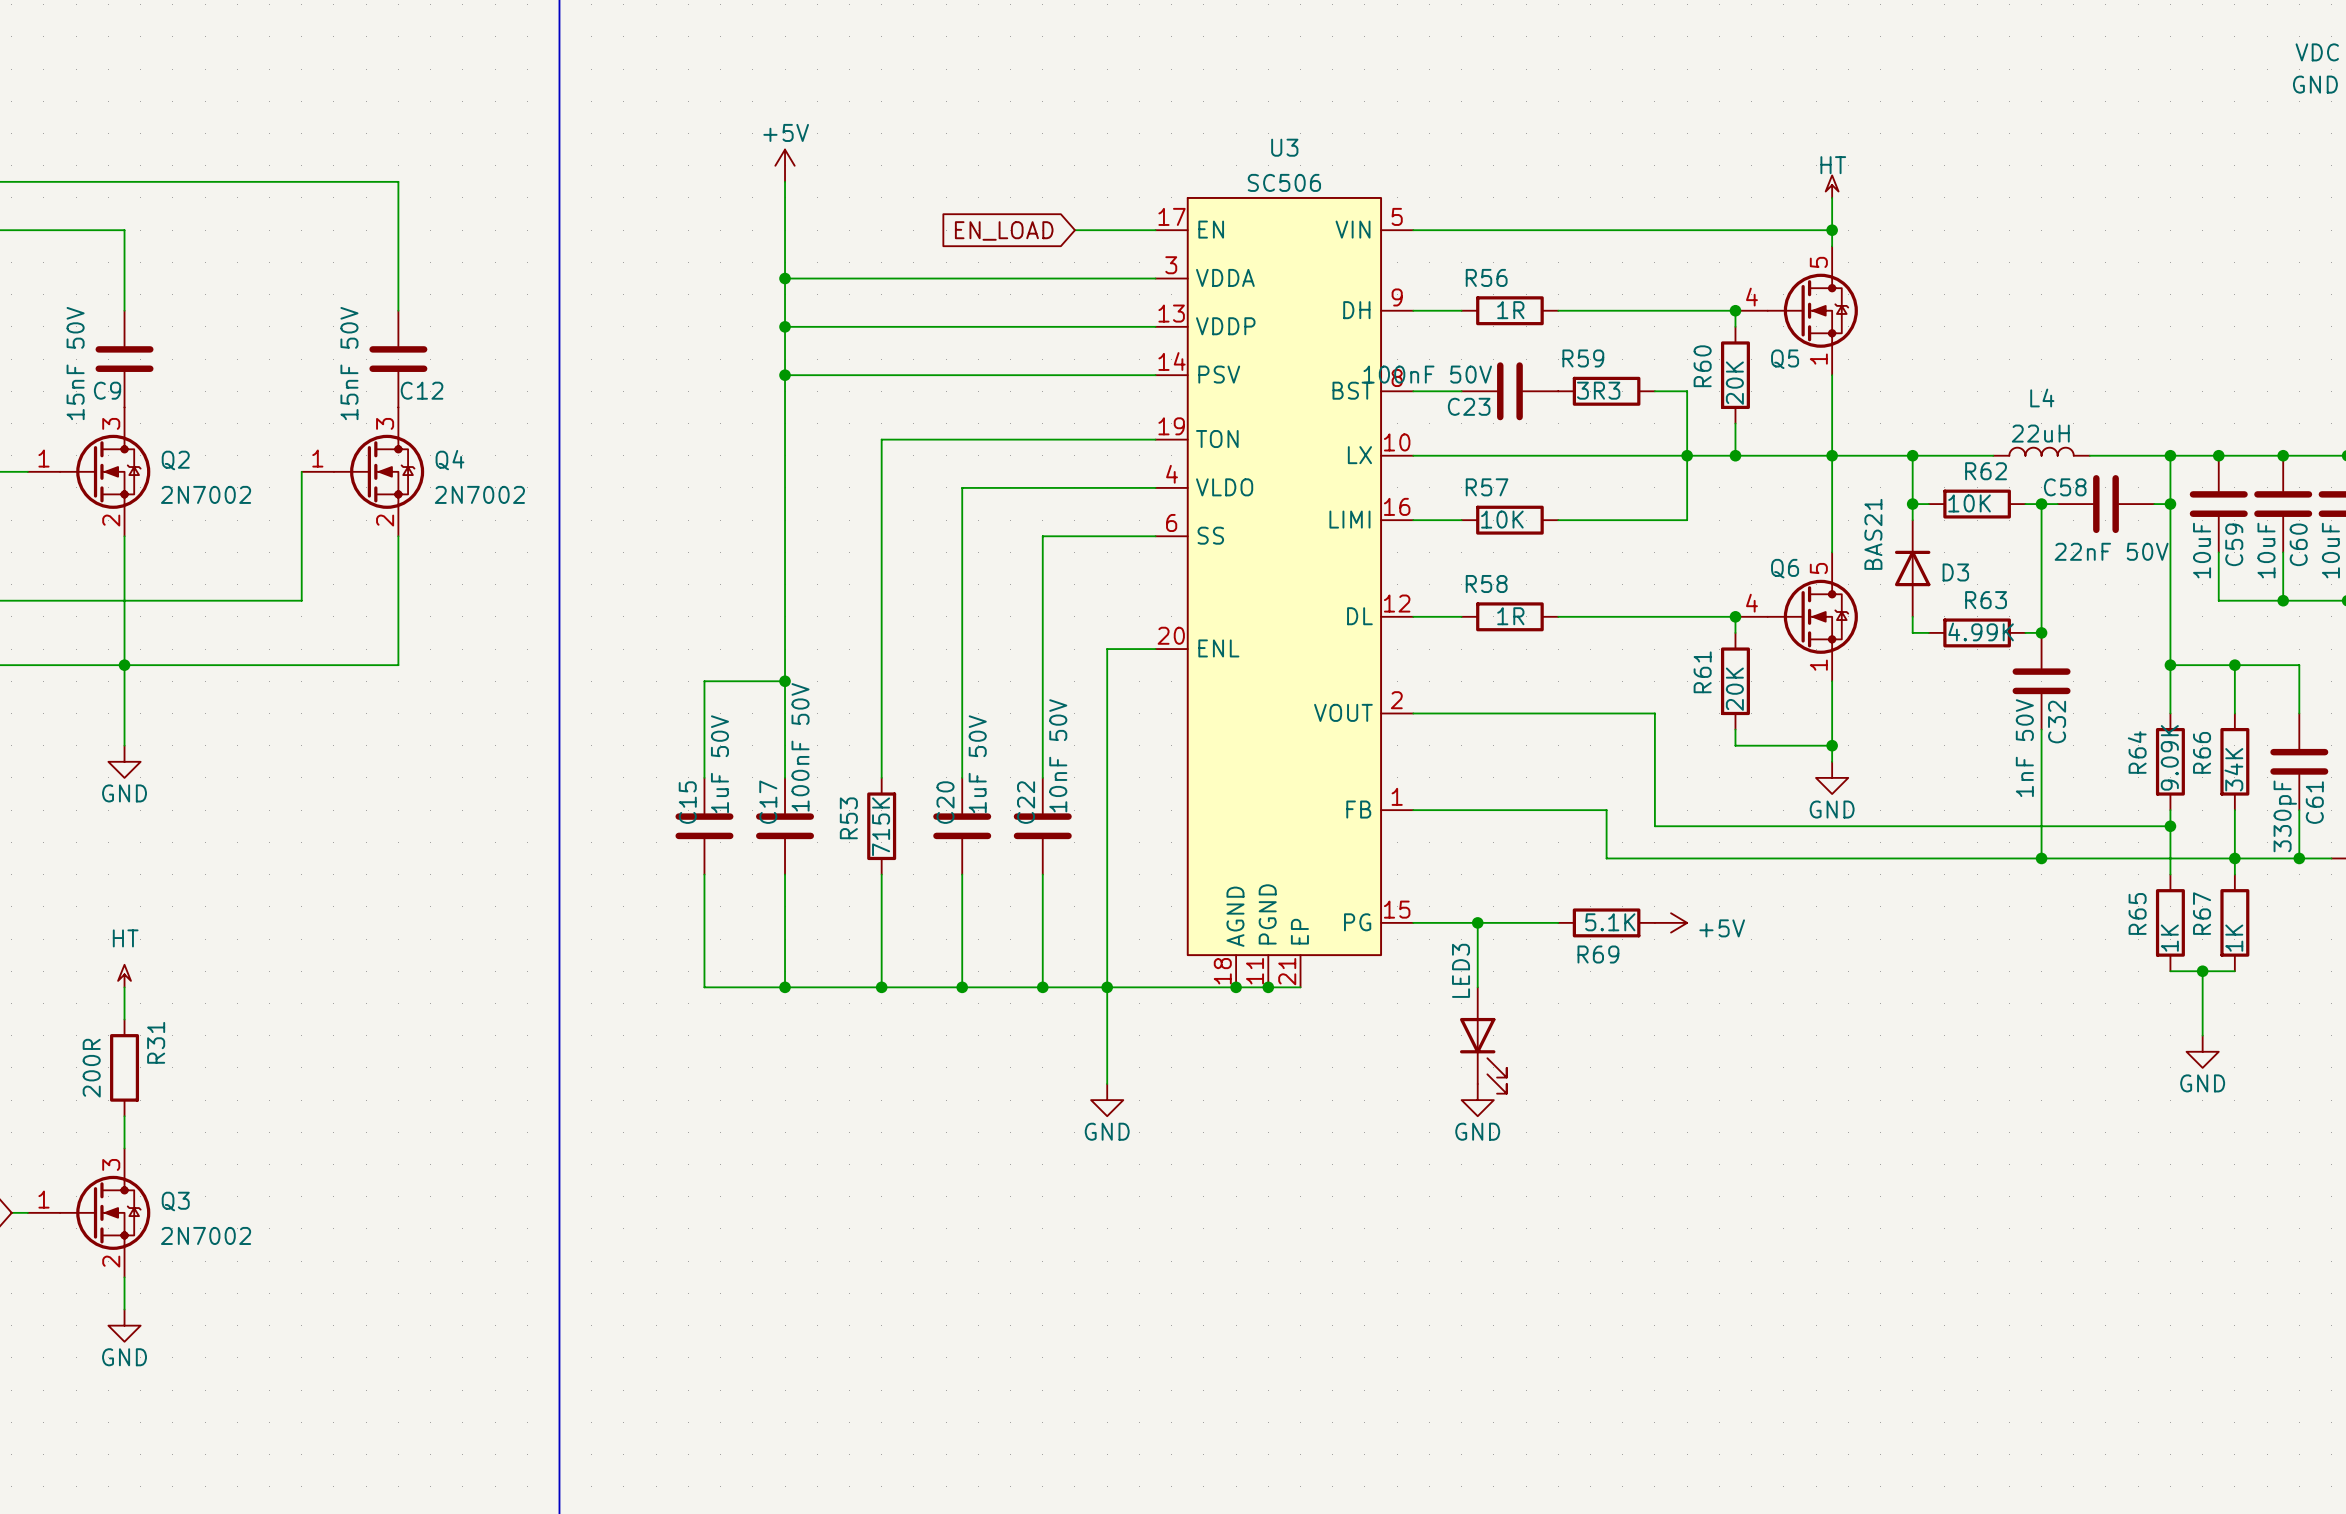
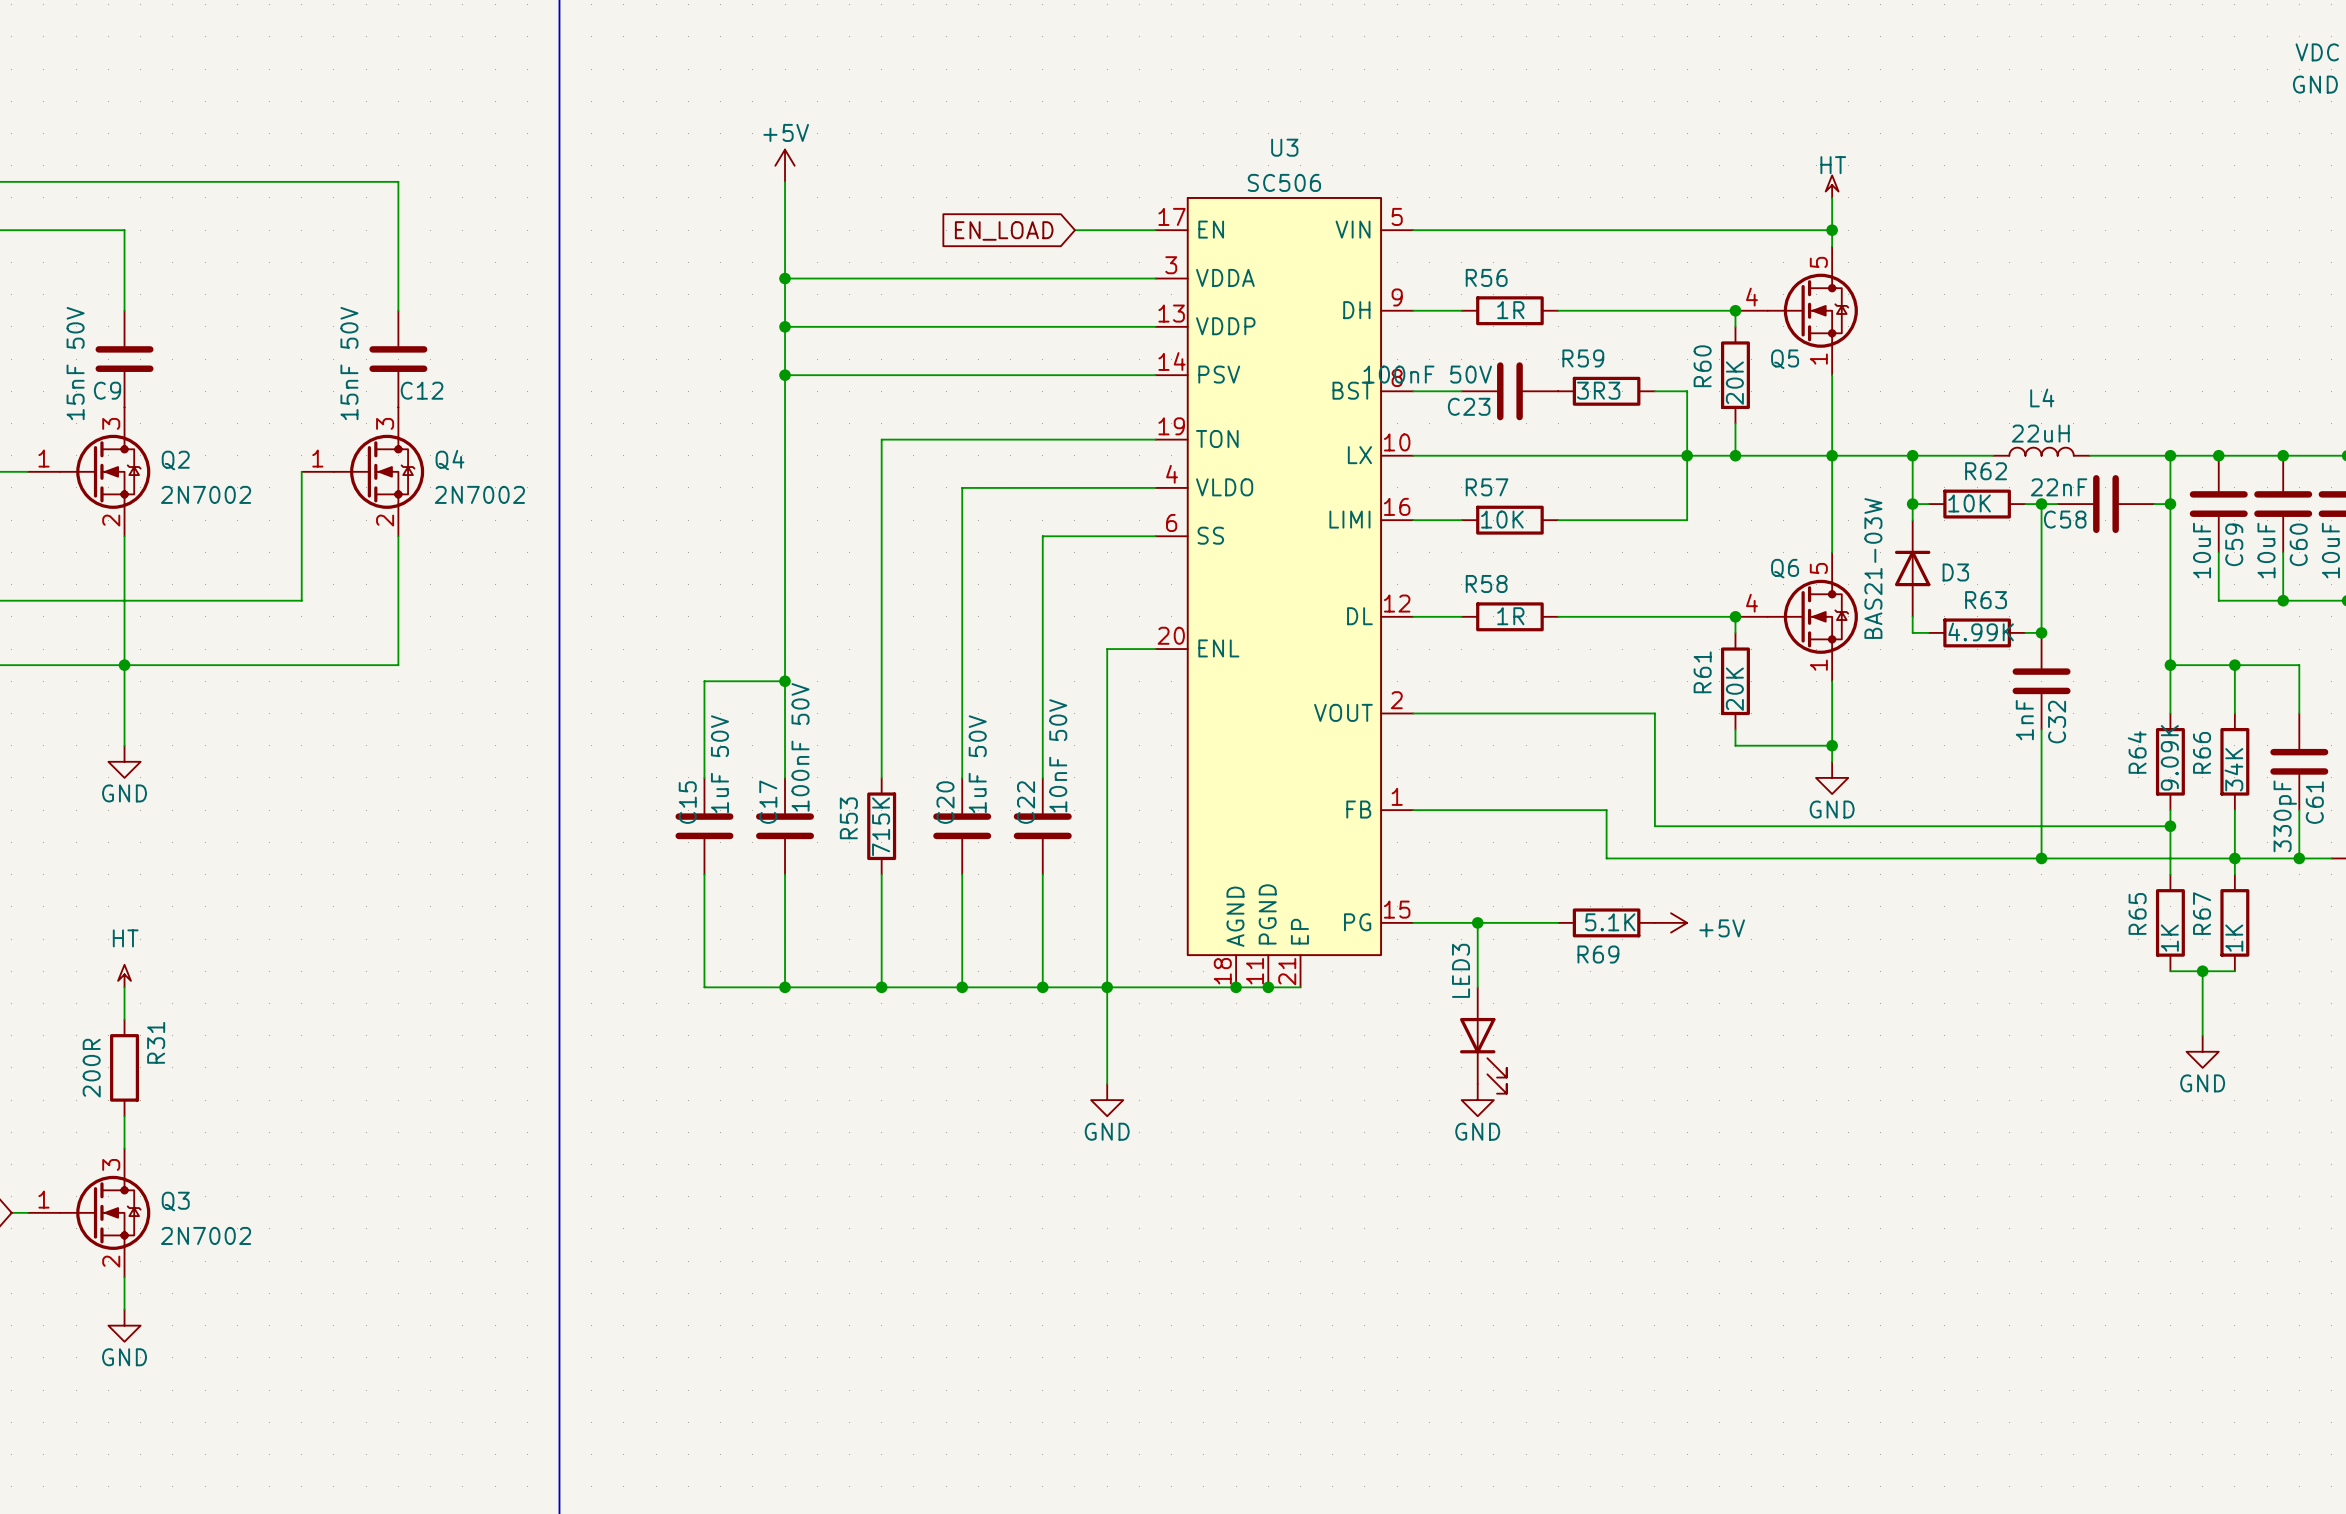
C58 name position: C58 (2065, 487) -> C58 (2065, 519)
D3 value: BAS21 (1873, 534) -> BAS21-03W (1873, 568)
C58 value: 22nF 50V (2111, 551) -> 22nF (2059, 487)
C32 value: 1nF 50V (2024, 748) -> 1nF (2024, 720)

